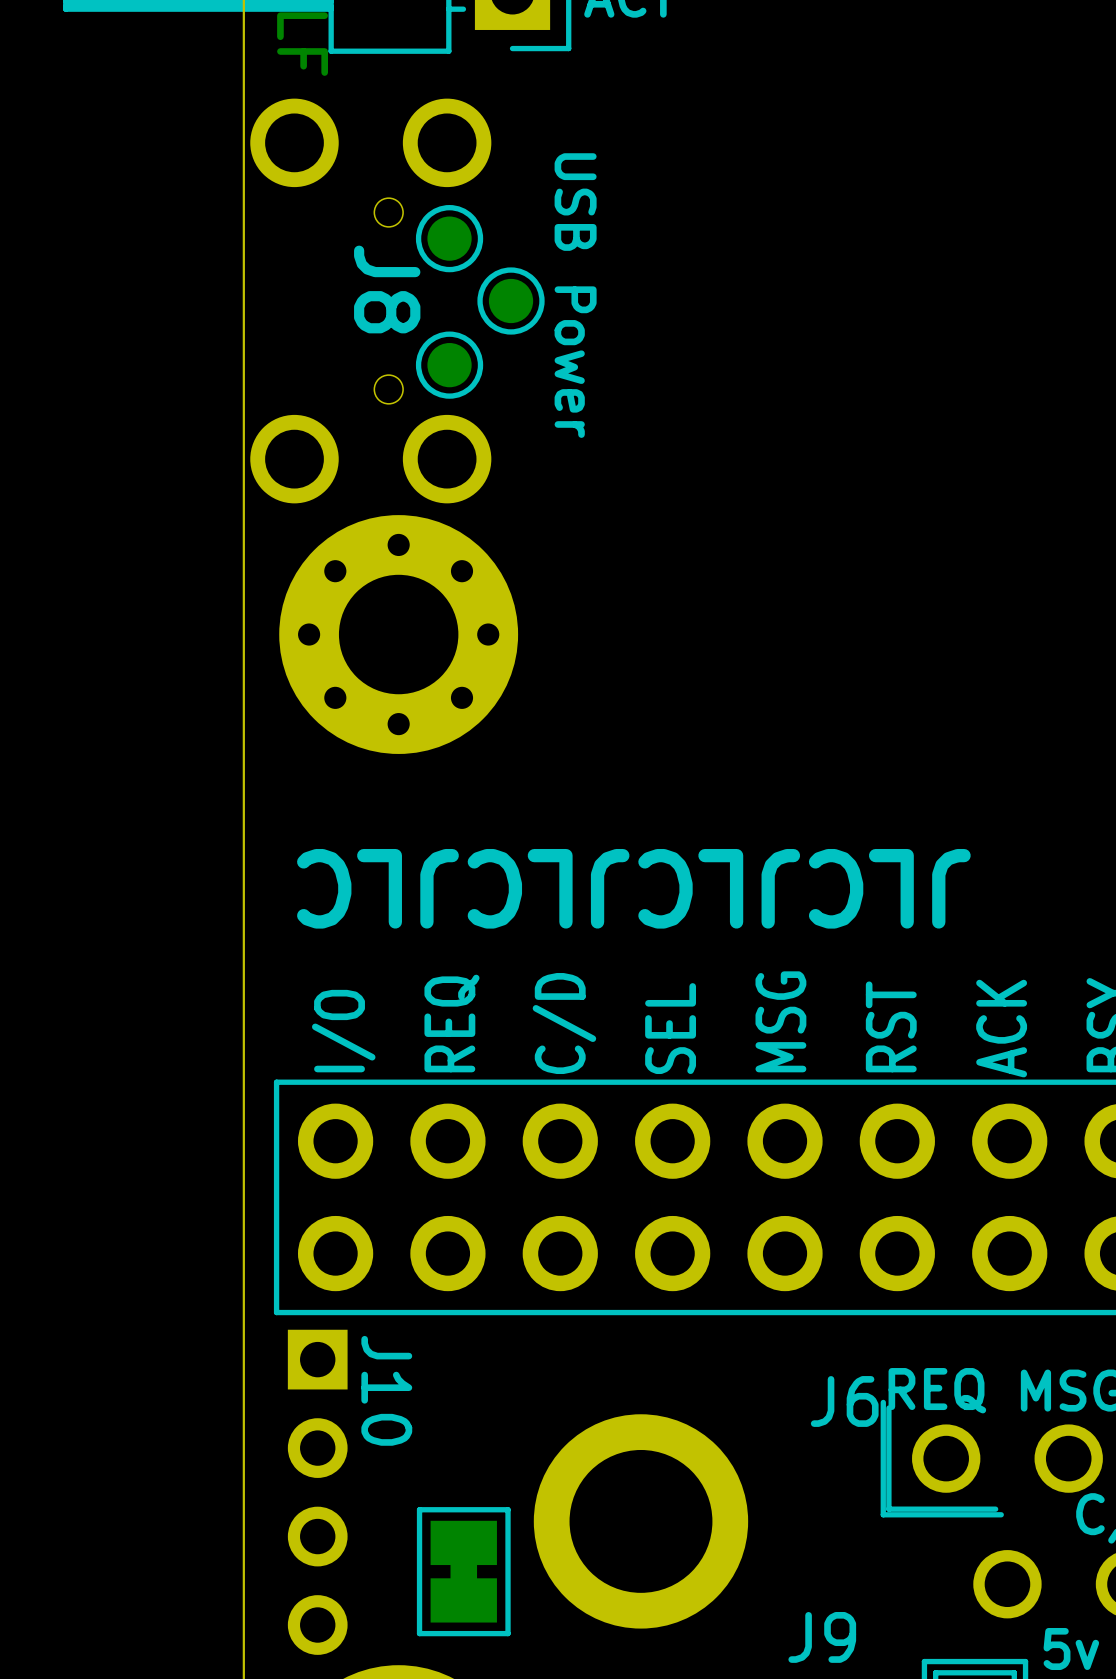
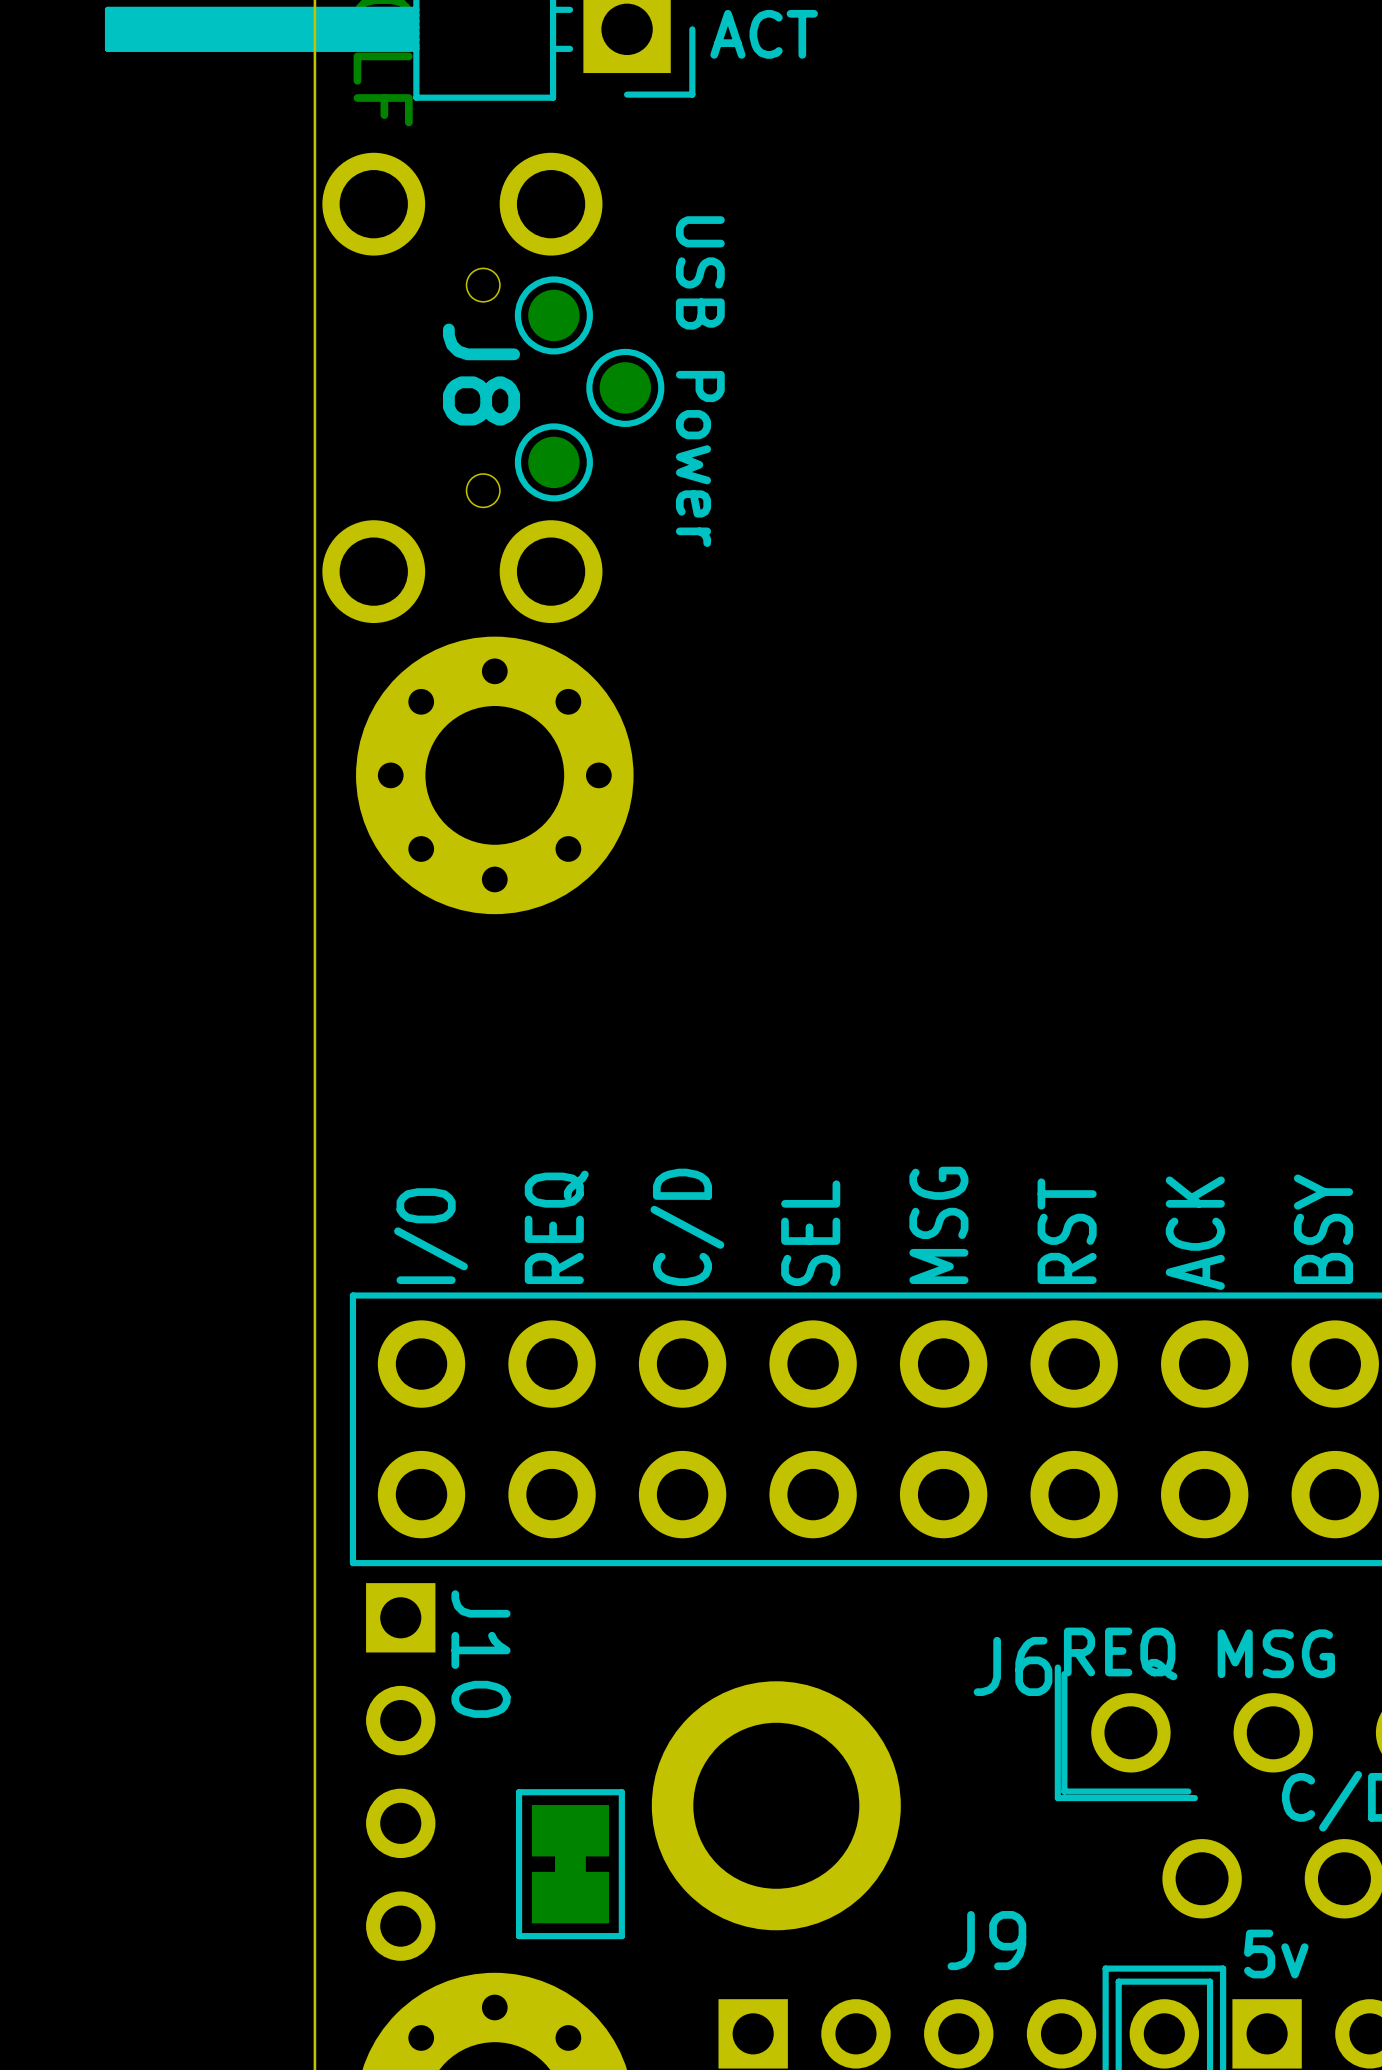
text: JLCJLCJLCJLC (633, 888) -> none

